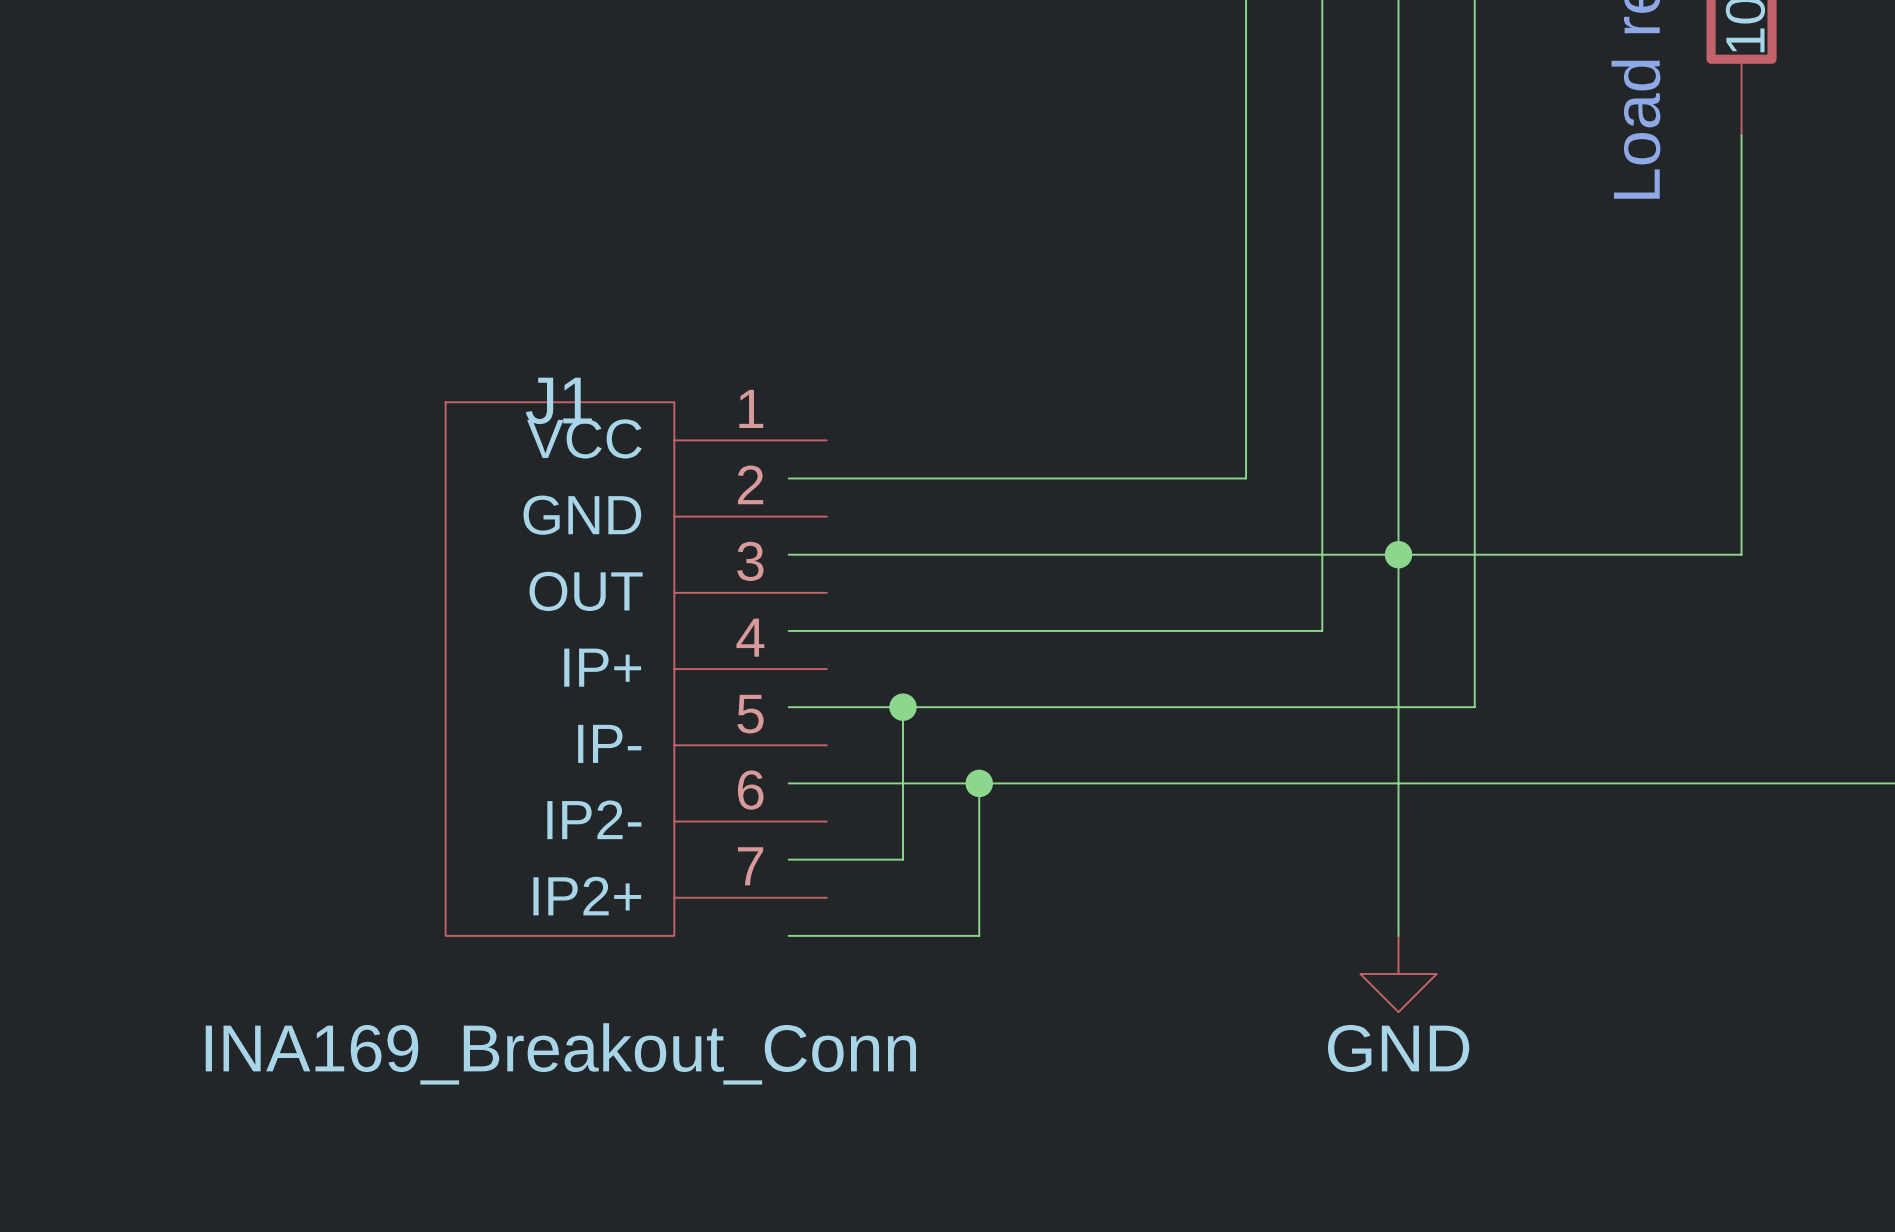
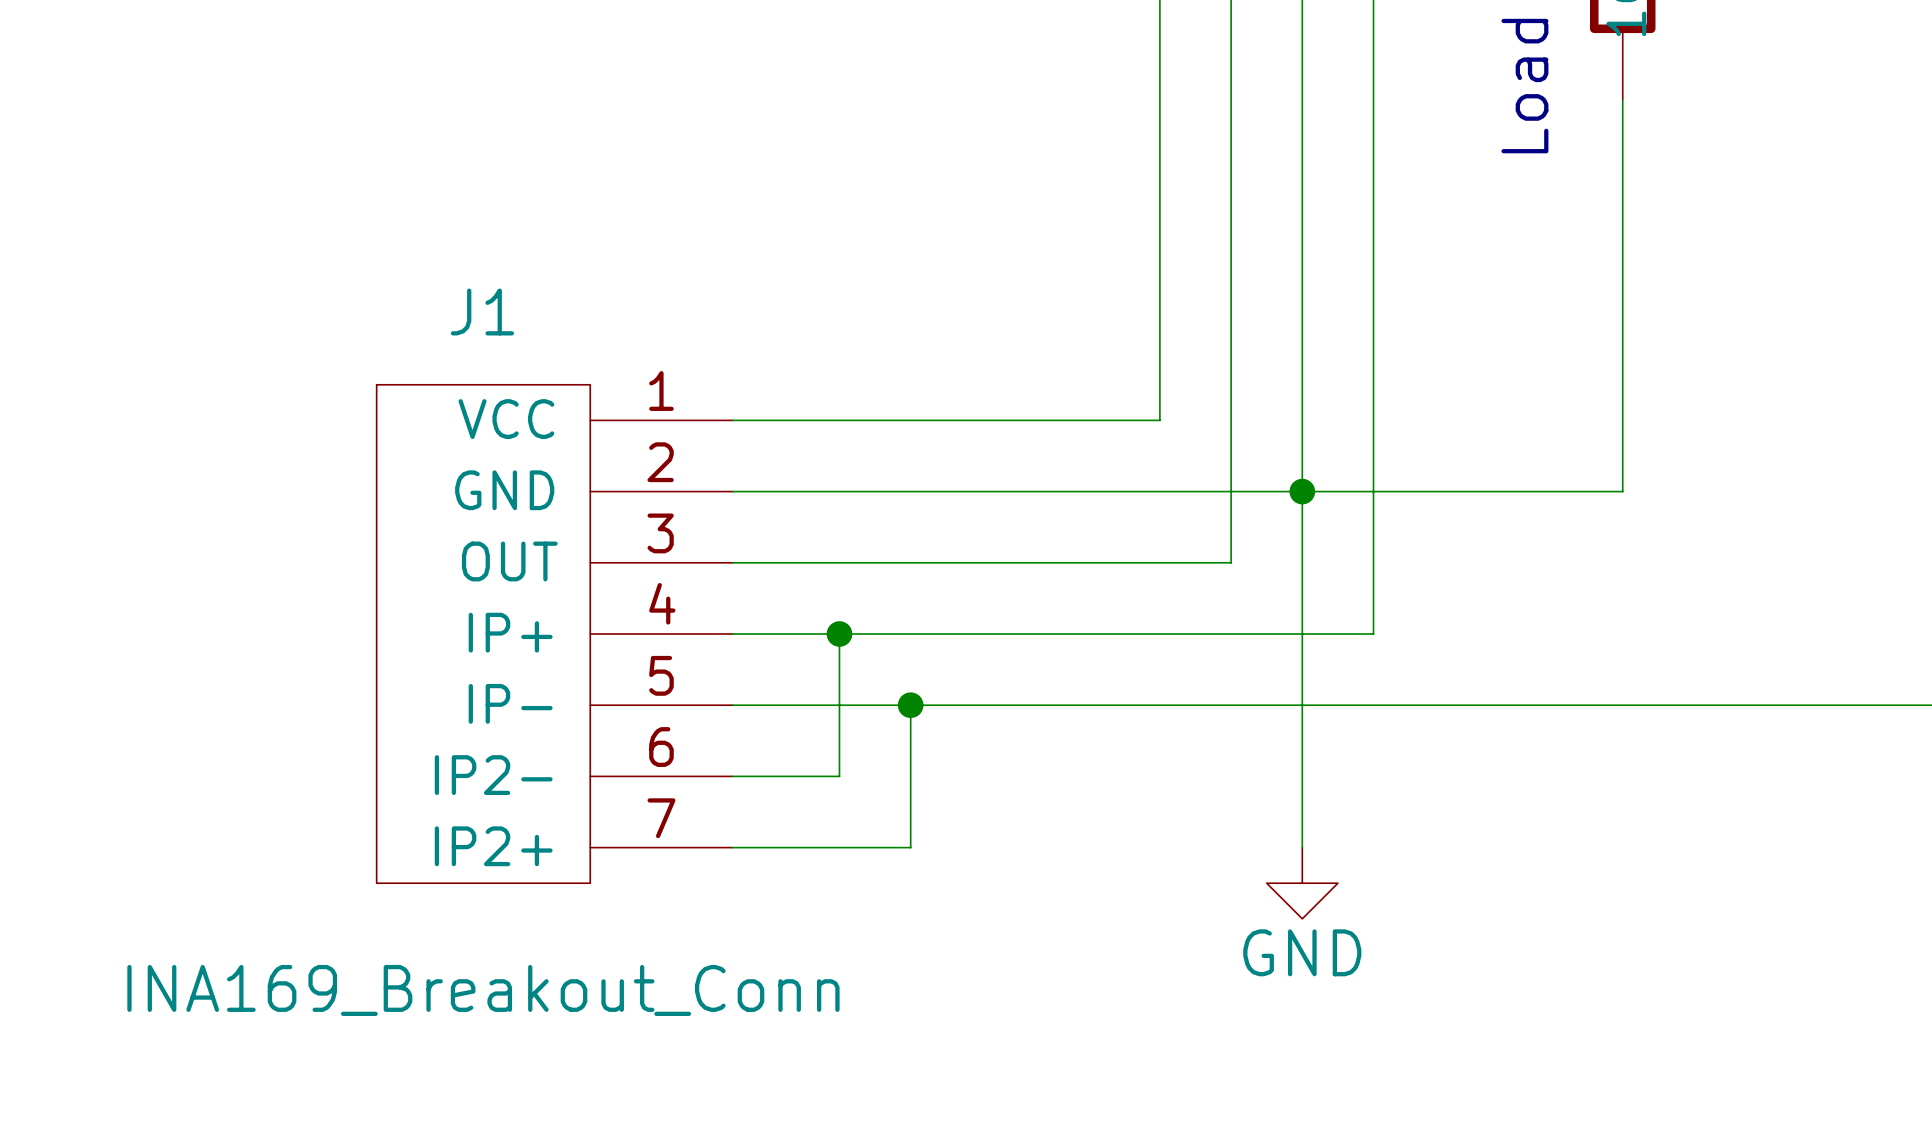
J1 name position: J1 (558, 400) -> J1 (482, 311)
J1 position: (636, 669) -> (554, 634)

